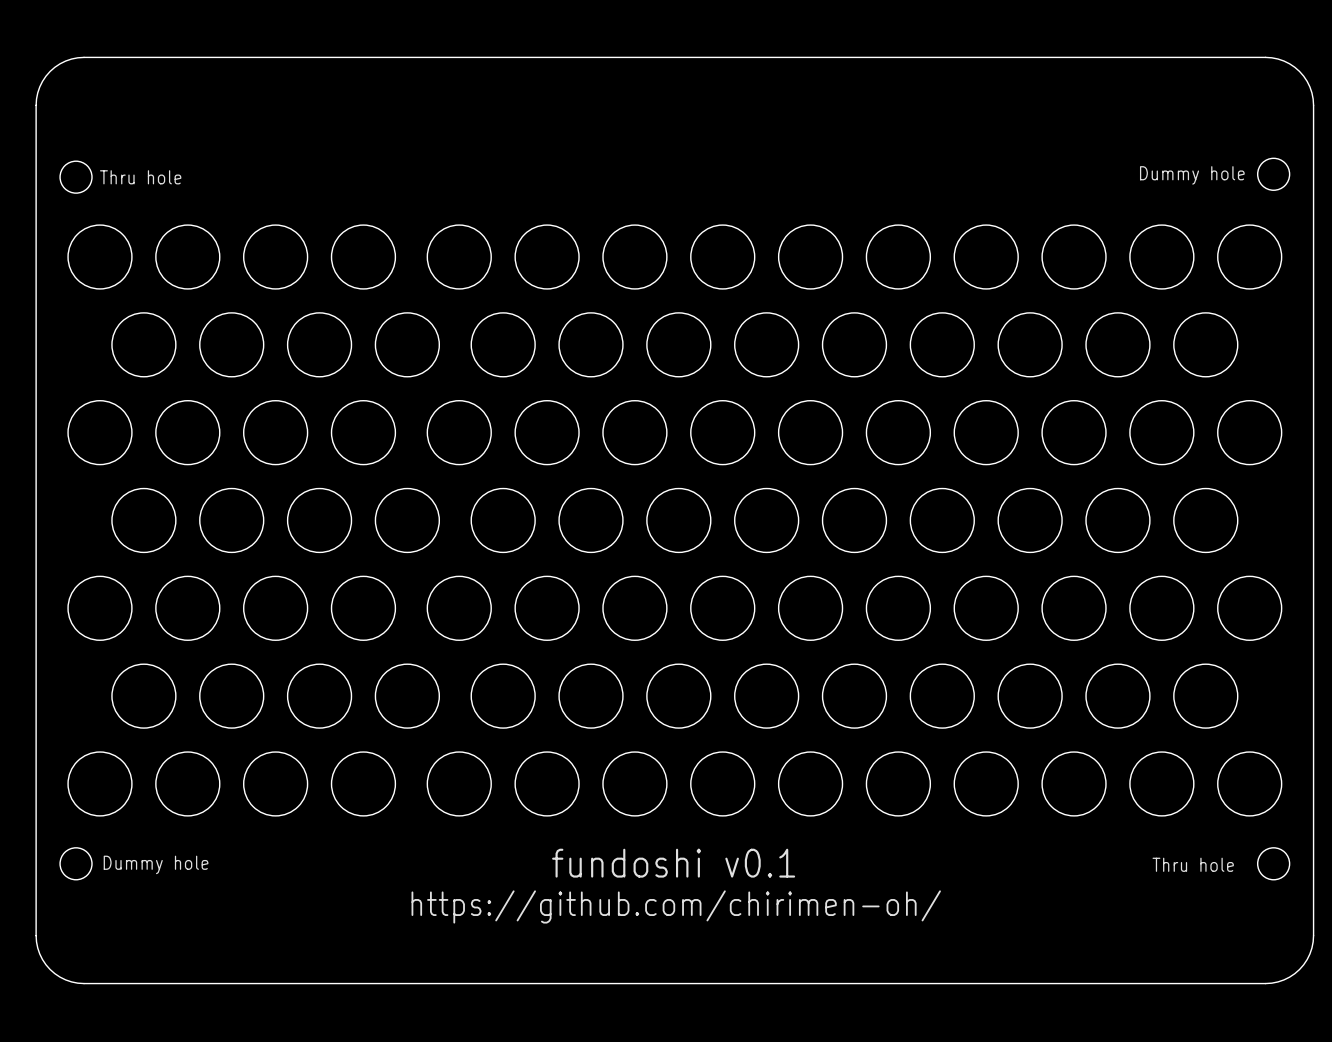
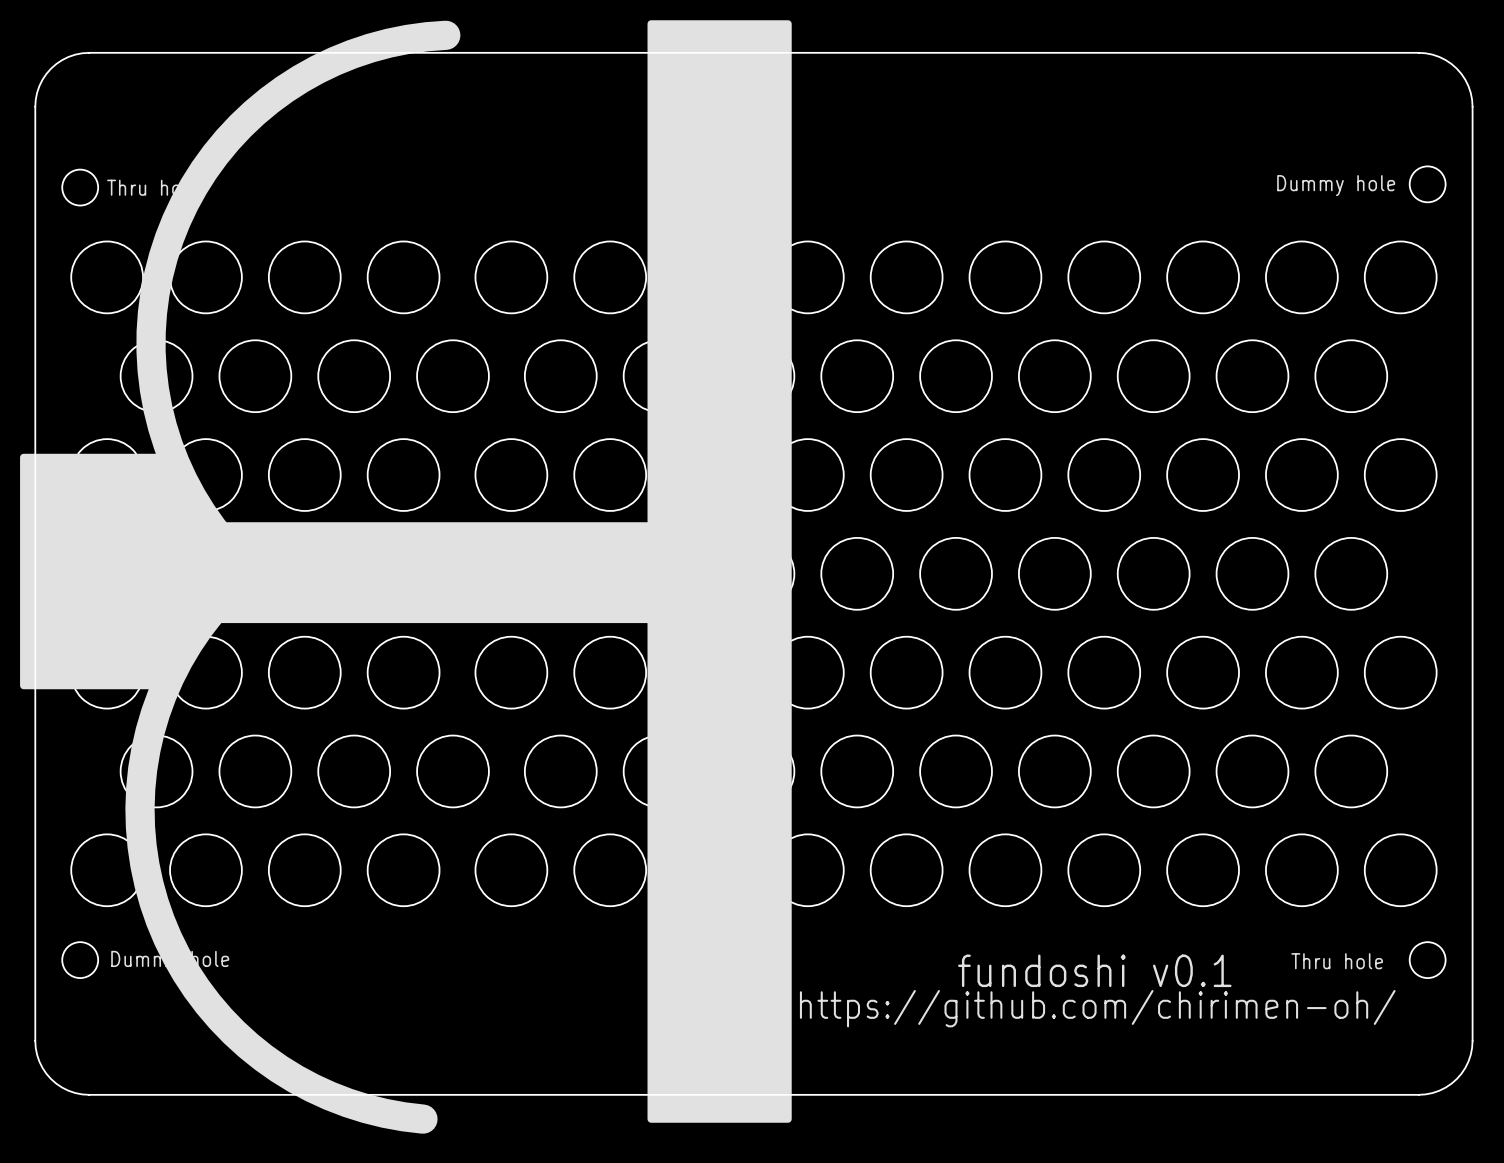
drawing: none -> [20, 20, 792, 1123]
line: none -> (445, 35) (407, 39) (370, 48) (334, 61) (284, 89) (240, 126) (215, 154) (184, 203) (169, 238) (154, 294) (151, 332) (152, 370) (157, 408) (175, 462) (192, 497) (213, 529) (251, 571) (211, 612) (188, 643) (169, 677) (155, 713) (145, 750) (139, 807) (144, 865) (160, 920) (185, 972) (220, 1018) (263, 1057) (312, 1087) (366, 1108) (423, 1119)
text position: fundoshi v0.1 (673, 863) -> fundoshi v0.1 (1094, 970)
text position: https://github.com/chirimen-oh/ (676, 906) -> https://github.com/chirimen-oh/ (1097, 1008)

